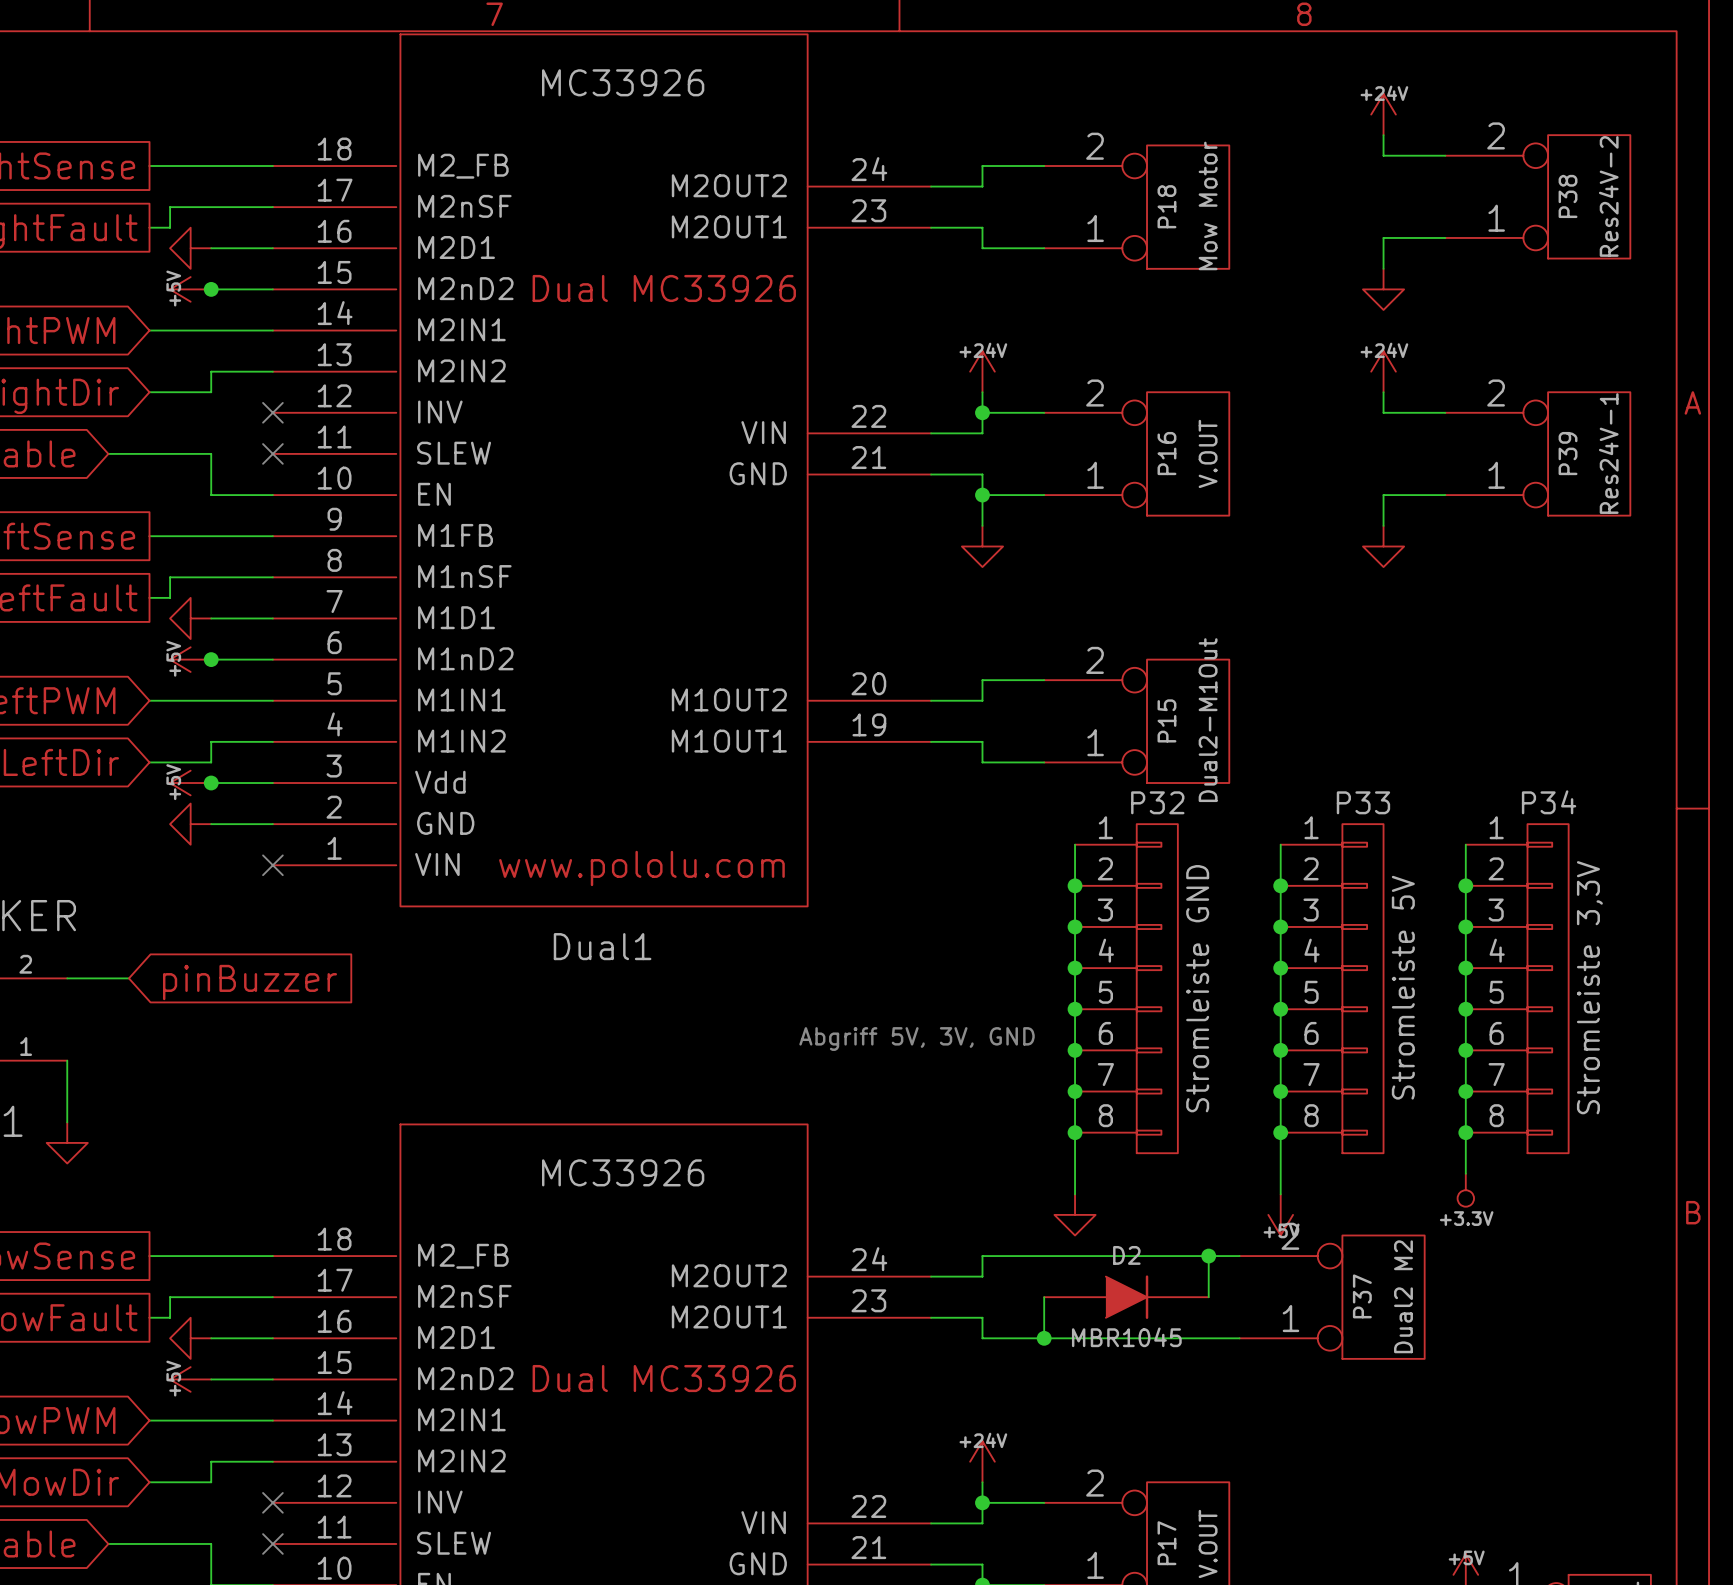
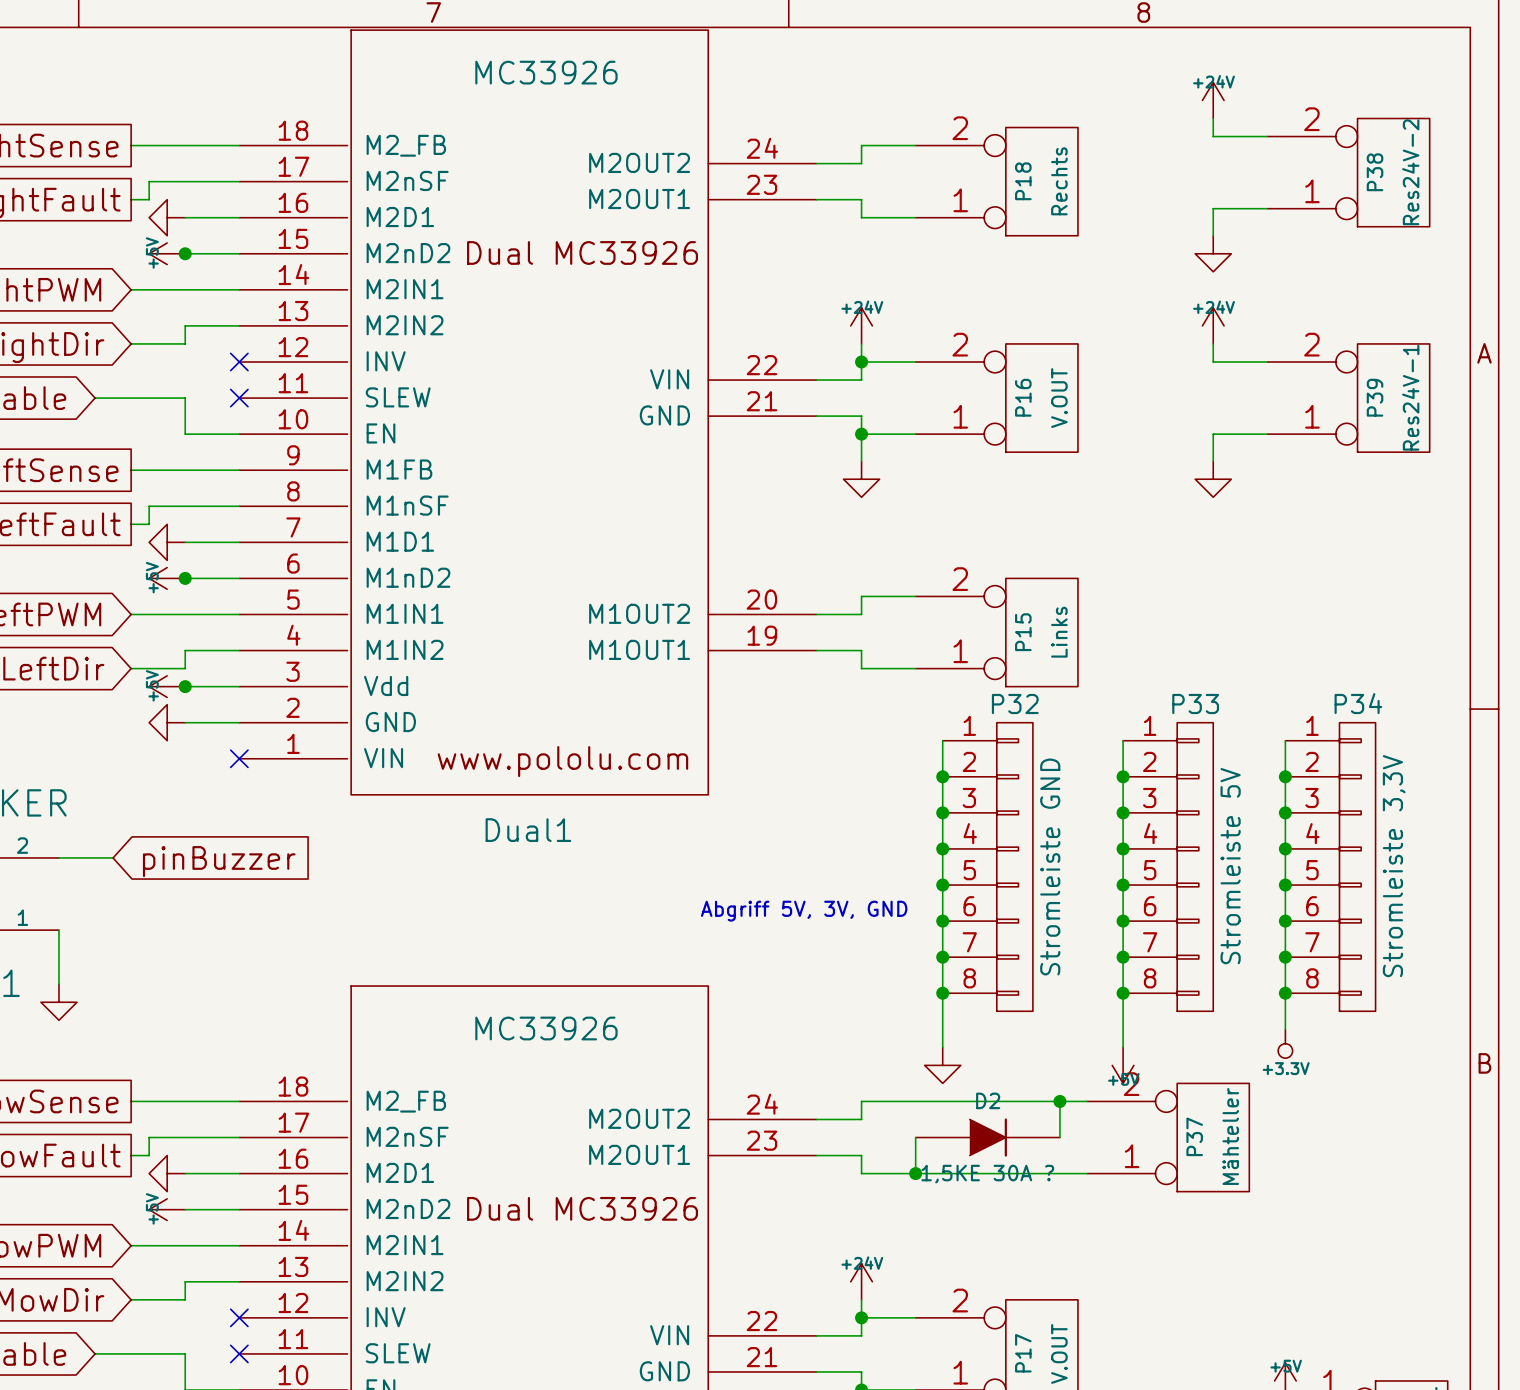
P18 value: Mow Motor (1208, 205) -> Rechts (1059, 181)
P15 value: Dual2-M1Out (1208, 720) -> Links (1059, 632)
P37 value: Dual2 M2 (1403, 1296) -> Mähteller (1230, 1136)
D2 value: MBR1045 (1126, 1337) -> 1,5KE 30A ? (987, 1174)

